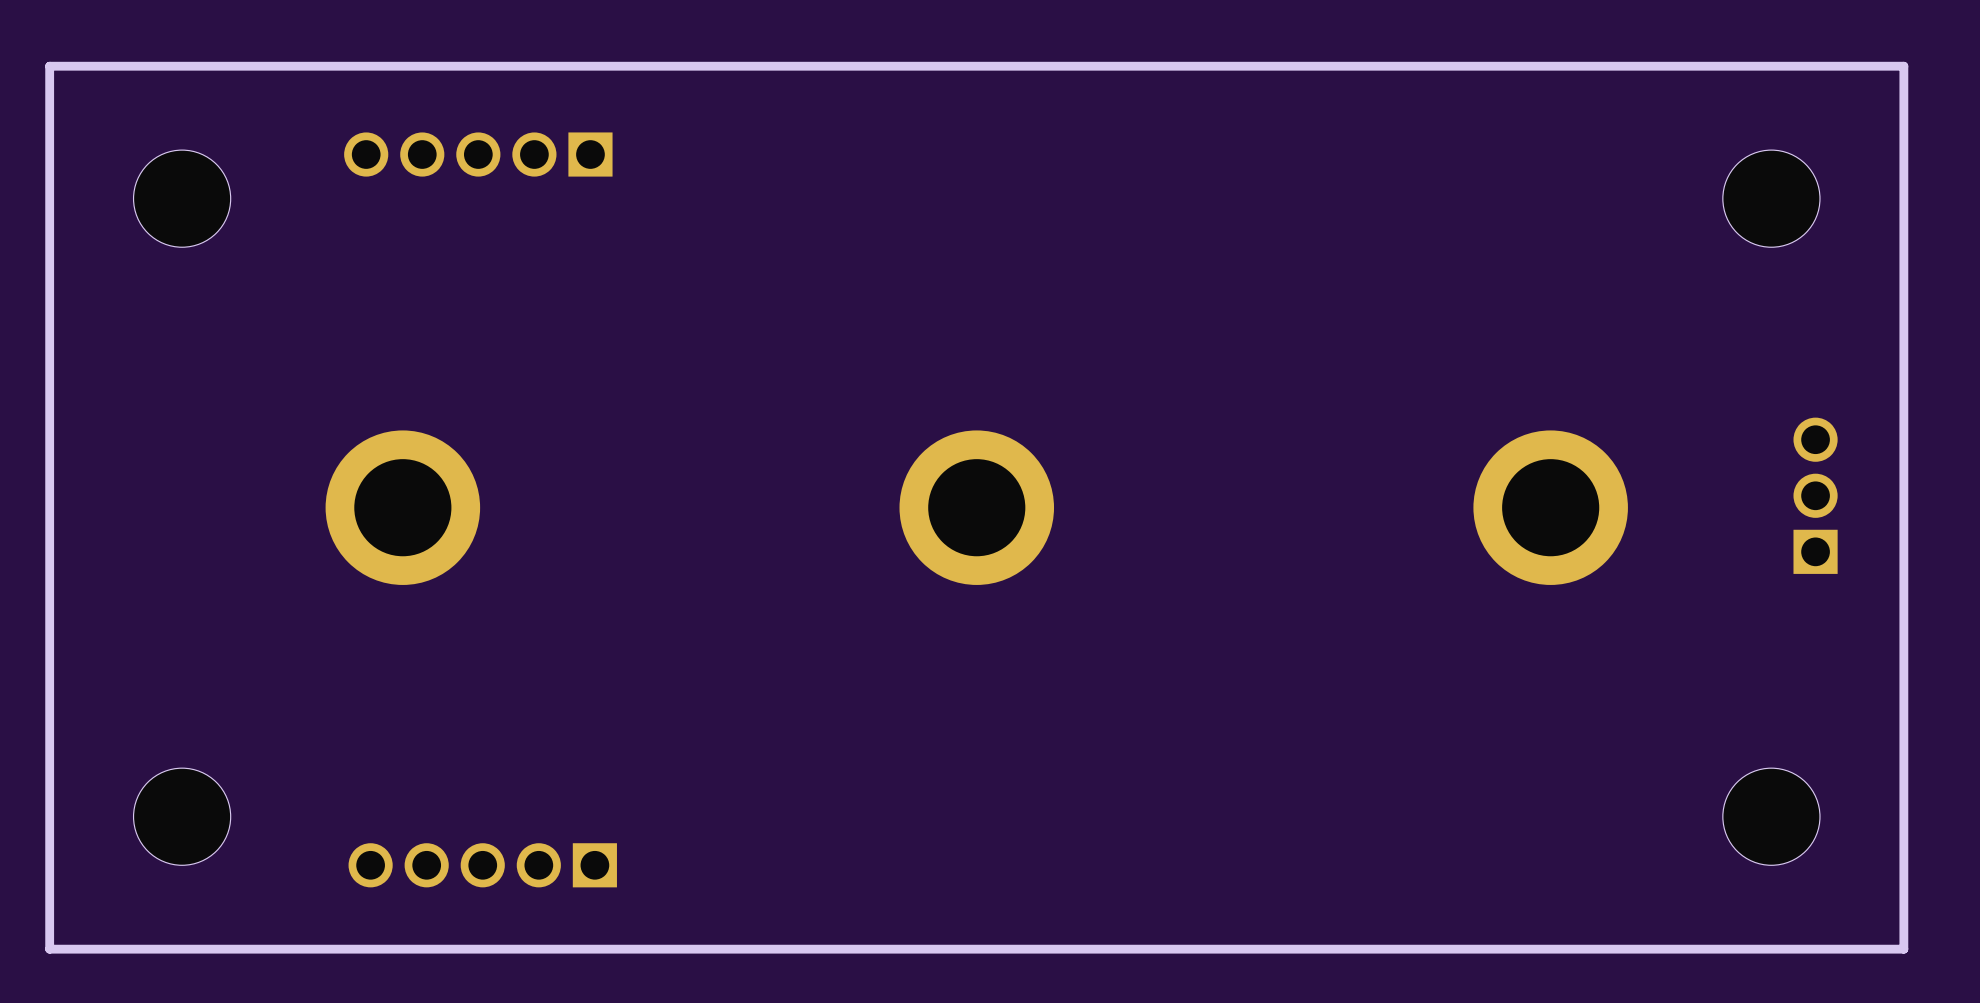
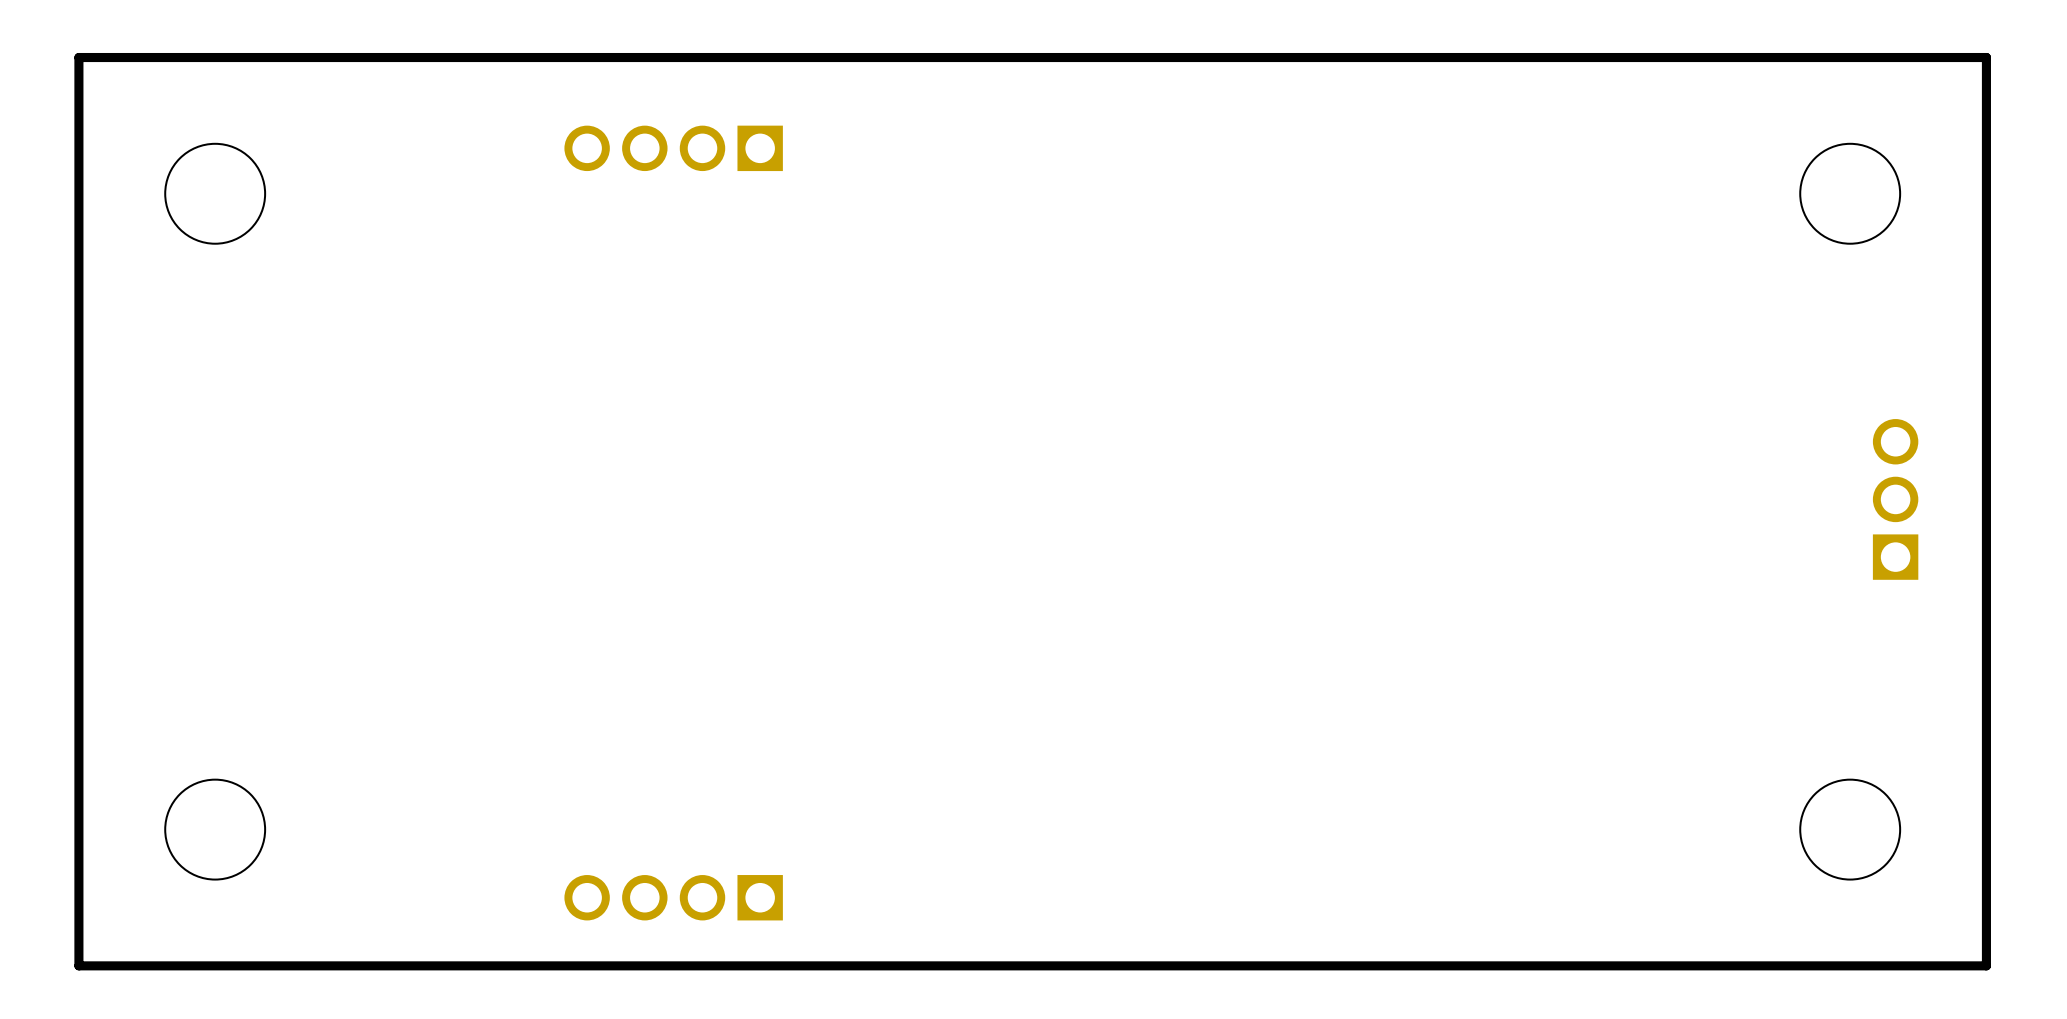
part: (478, 154) -> none
part: none -> (673, 148)
part: (402, 507) -> none
part: (976, 507) -> none
part: (1550, 507) -> none
part: (482, 865) -> none
part: none -> (673, 897)

